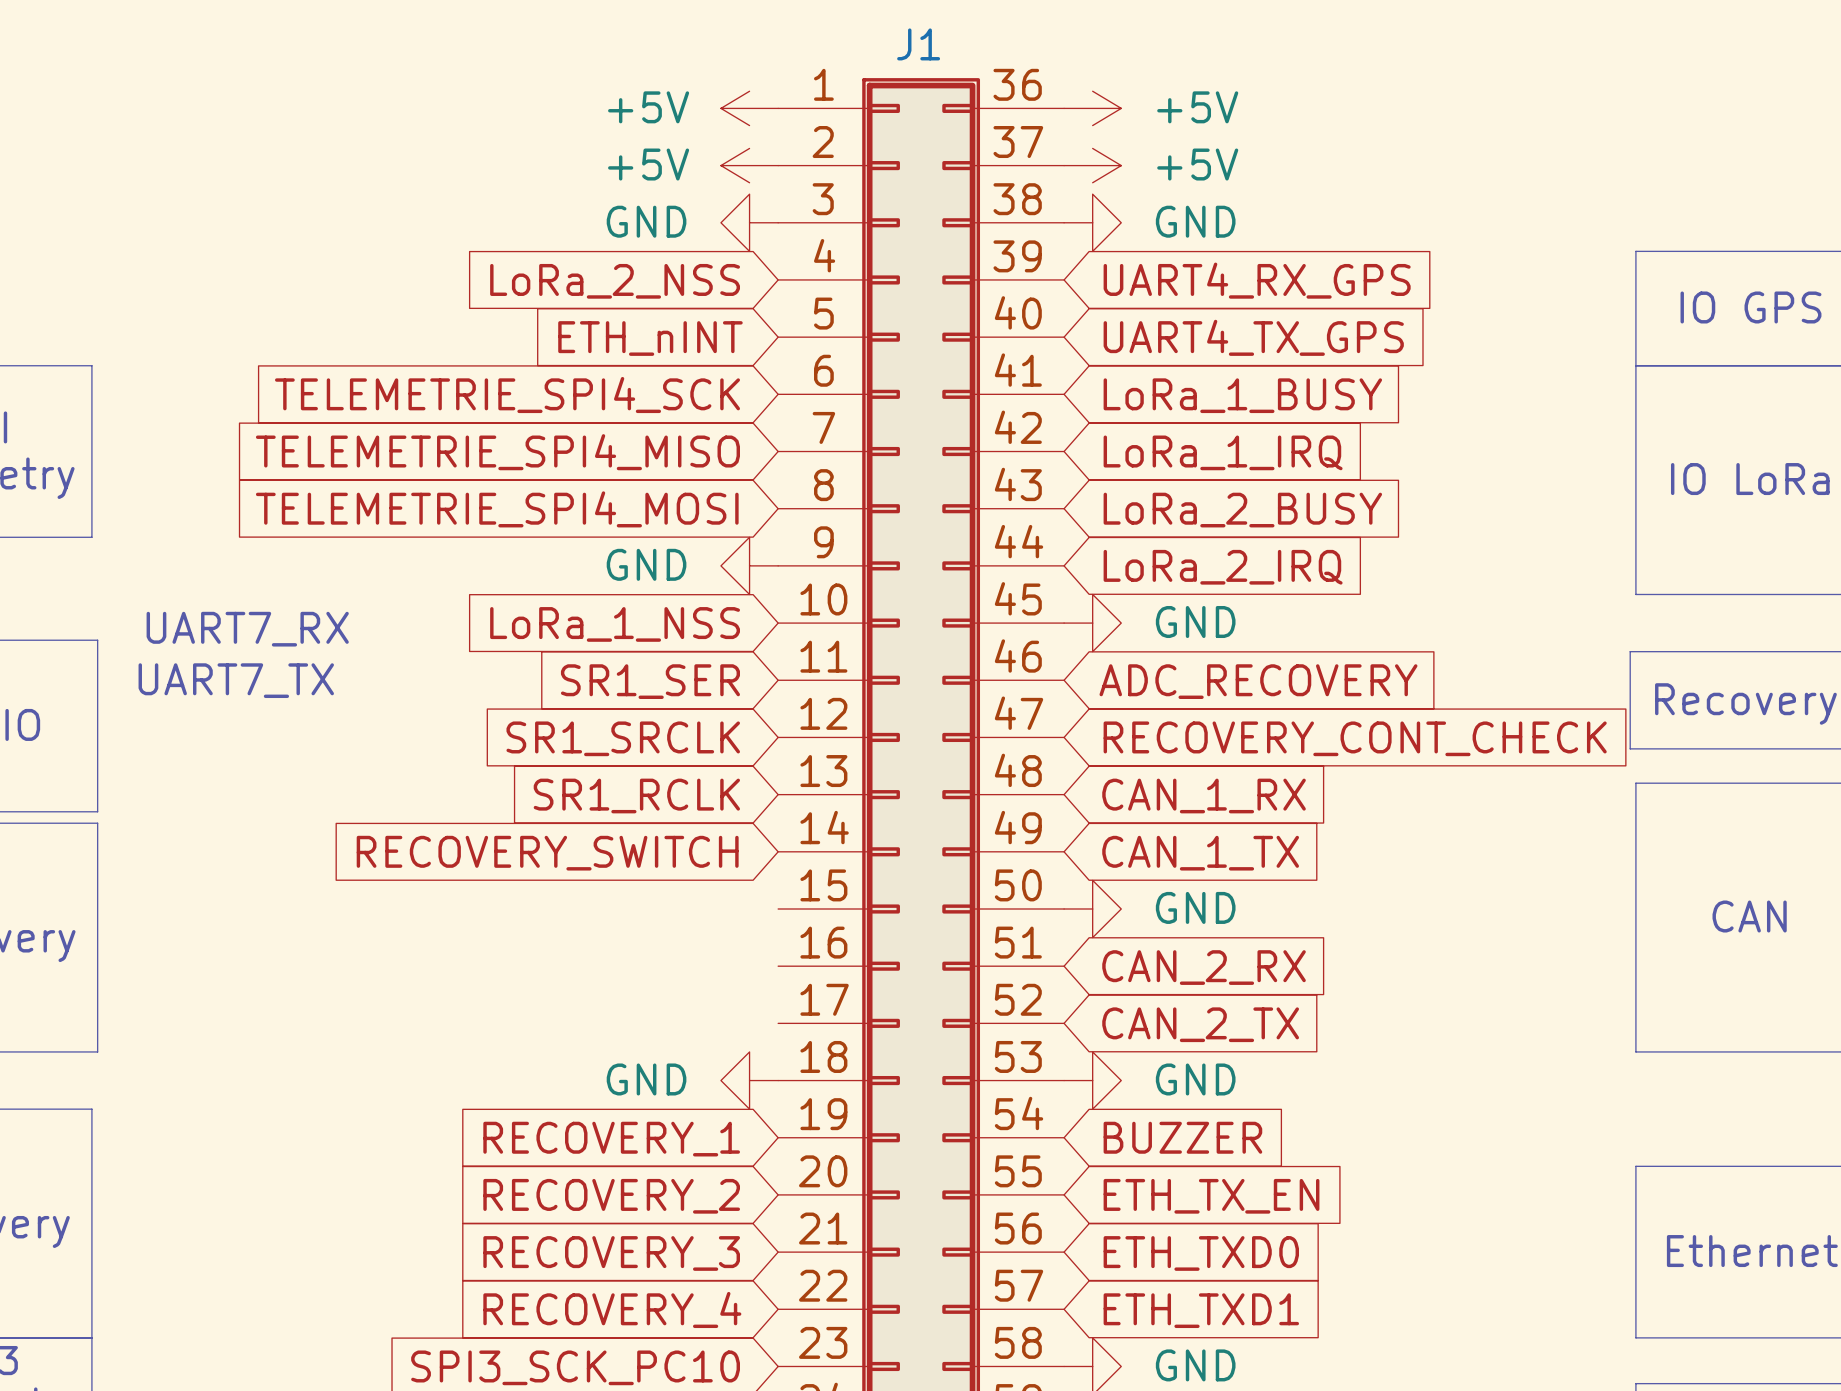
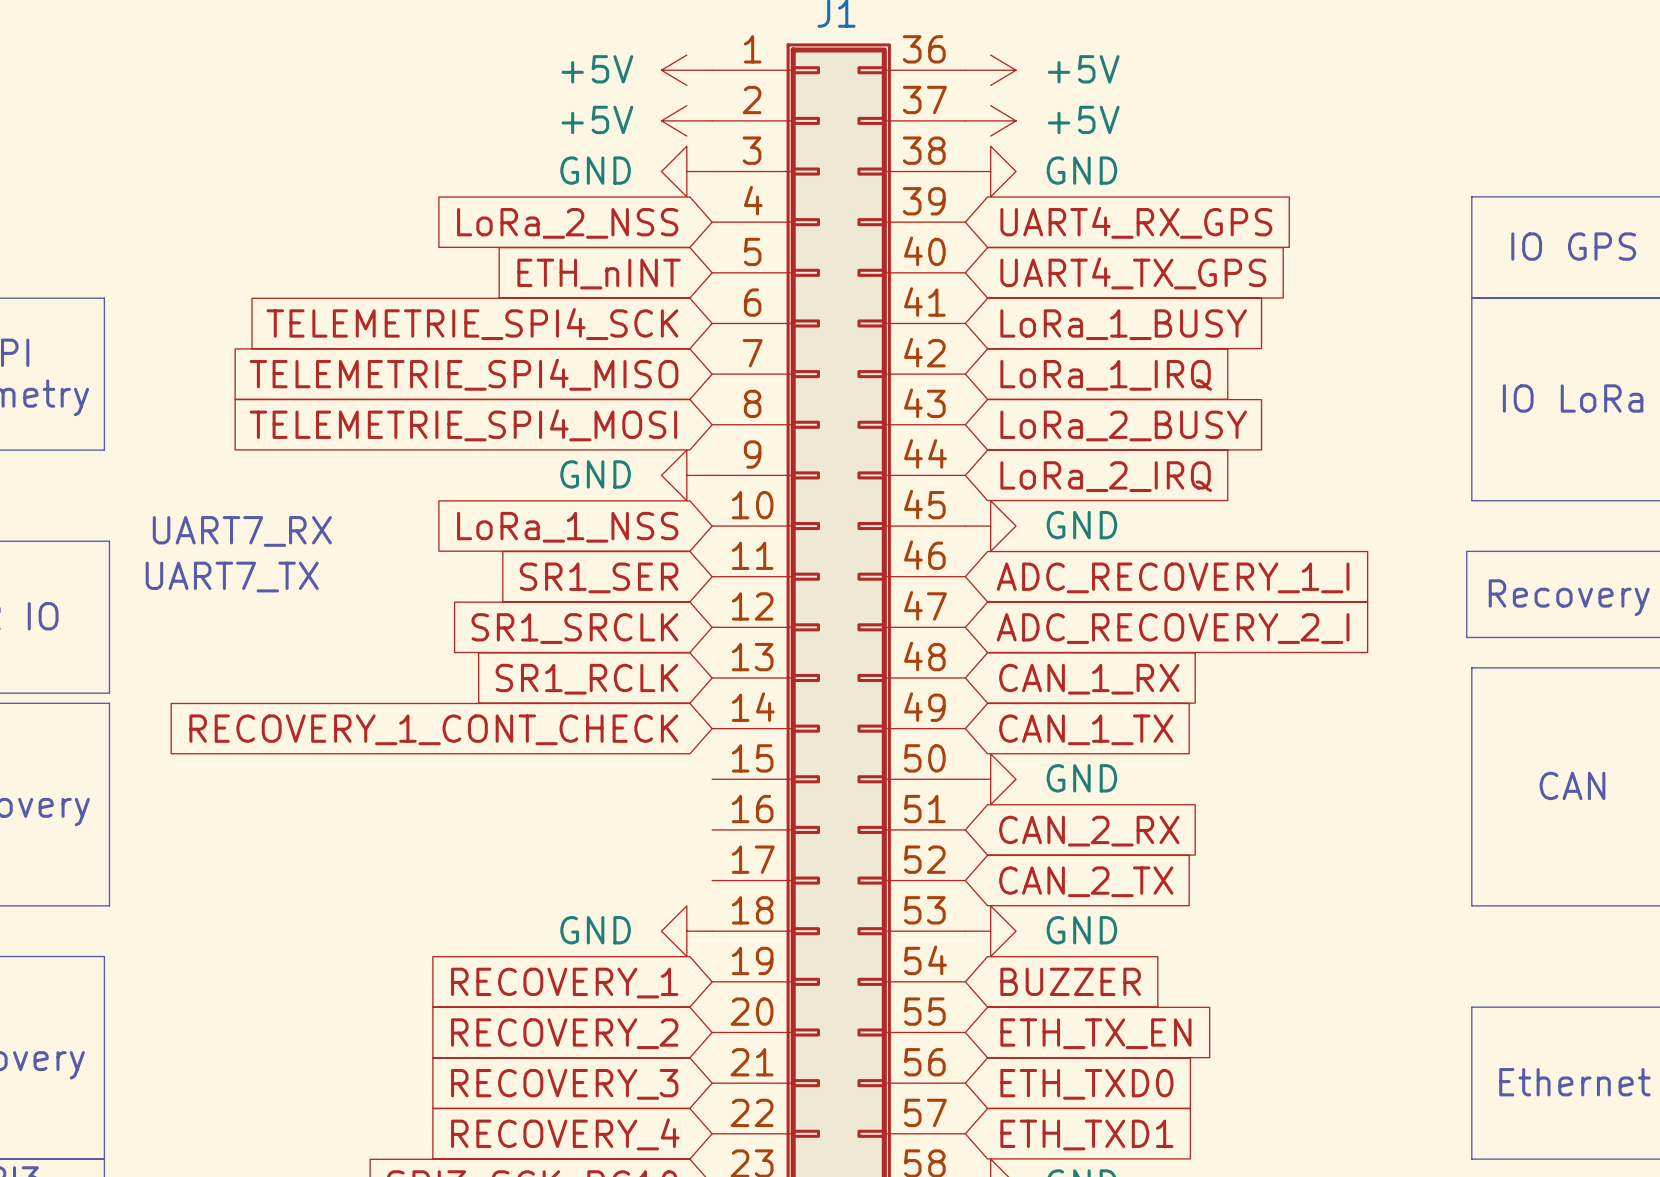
global label: ADC_RECOVERY (1258, 681) -> ADC_RECOVERY_1_I (1173, 577)
global label: RECOVERY_CONT_CHECK (1355, 738) -> ADC_RECOVERY_2_I (1173, 628)
global label: RECOVERY_SWITCH (547, 853) -> RECOVERY_1_CONT_CHECK (433, 729)

